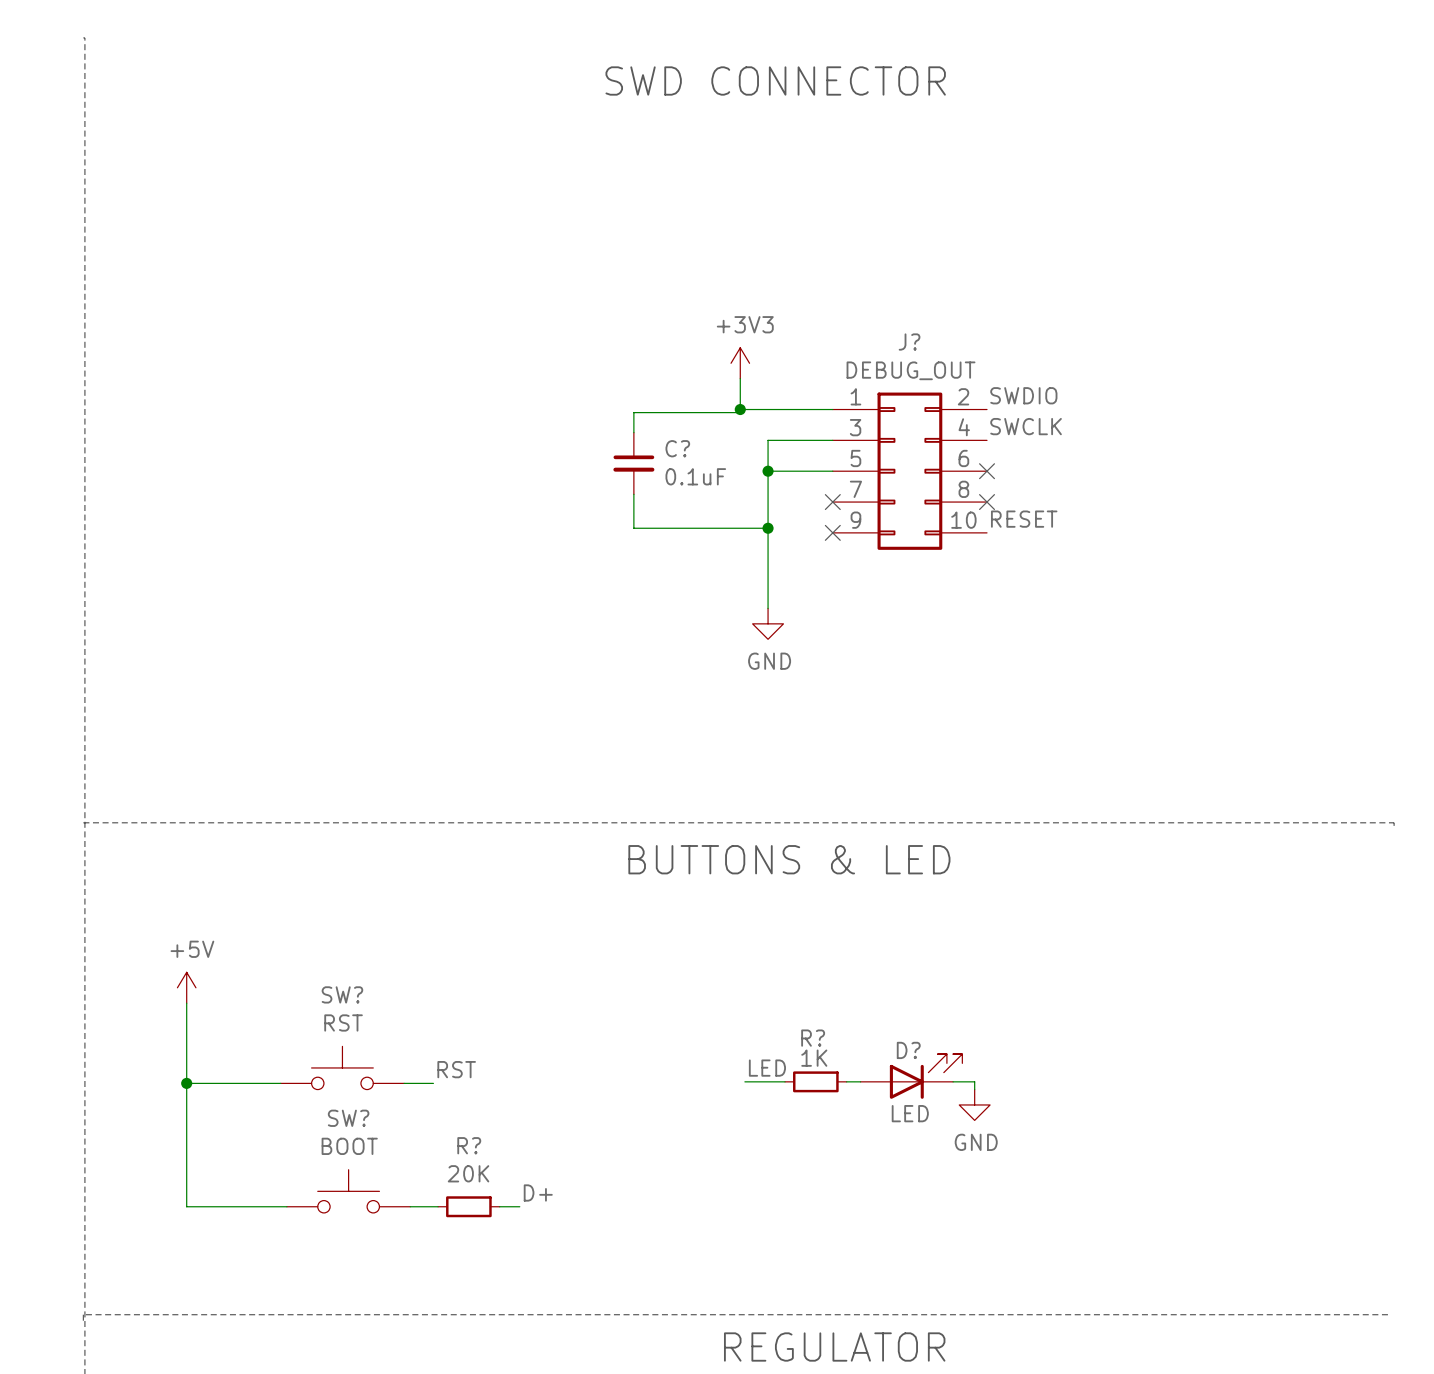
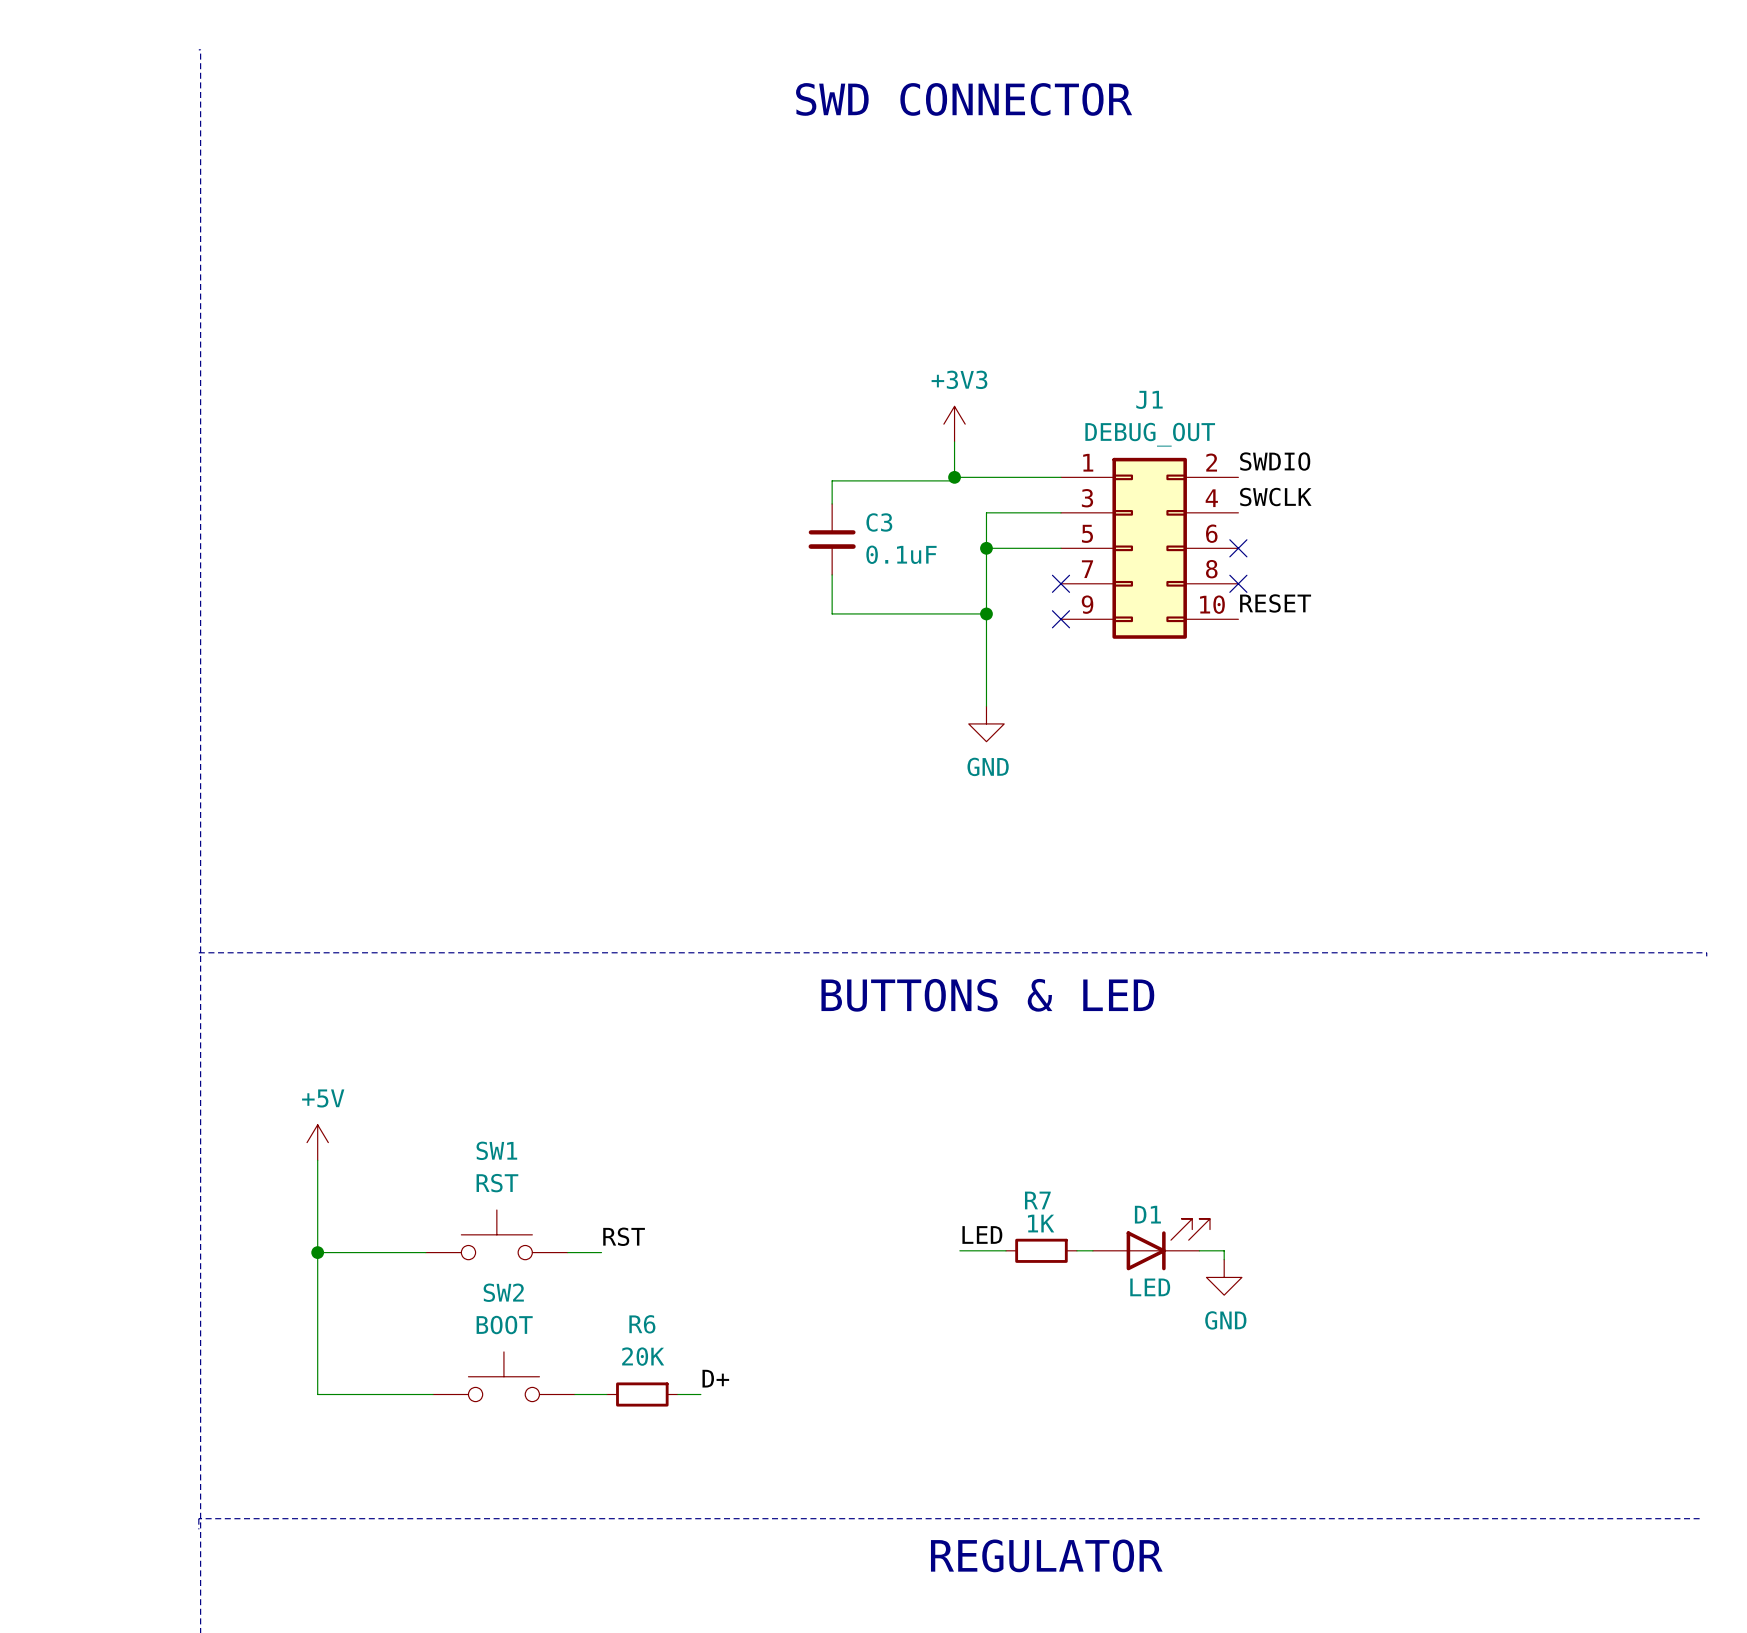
J? name: J? (909, 342) -> J1 (1149, 399)
C? name: C? (677, 448) -> C3 (879, 522)
SW? name: SW? (342, 994) -> SW1 (496, 1150)
R? name: R? (813, 1038) -> R7 (1037, 1200)
D? name: D? (908, 1050) -> D1 (1147, 1214)
SW? name: SW? (348, 1118) -> SW2 (503, 1292)
R? name: R? (469, 1145) -> R6 (642, 1324)

